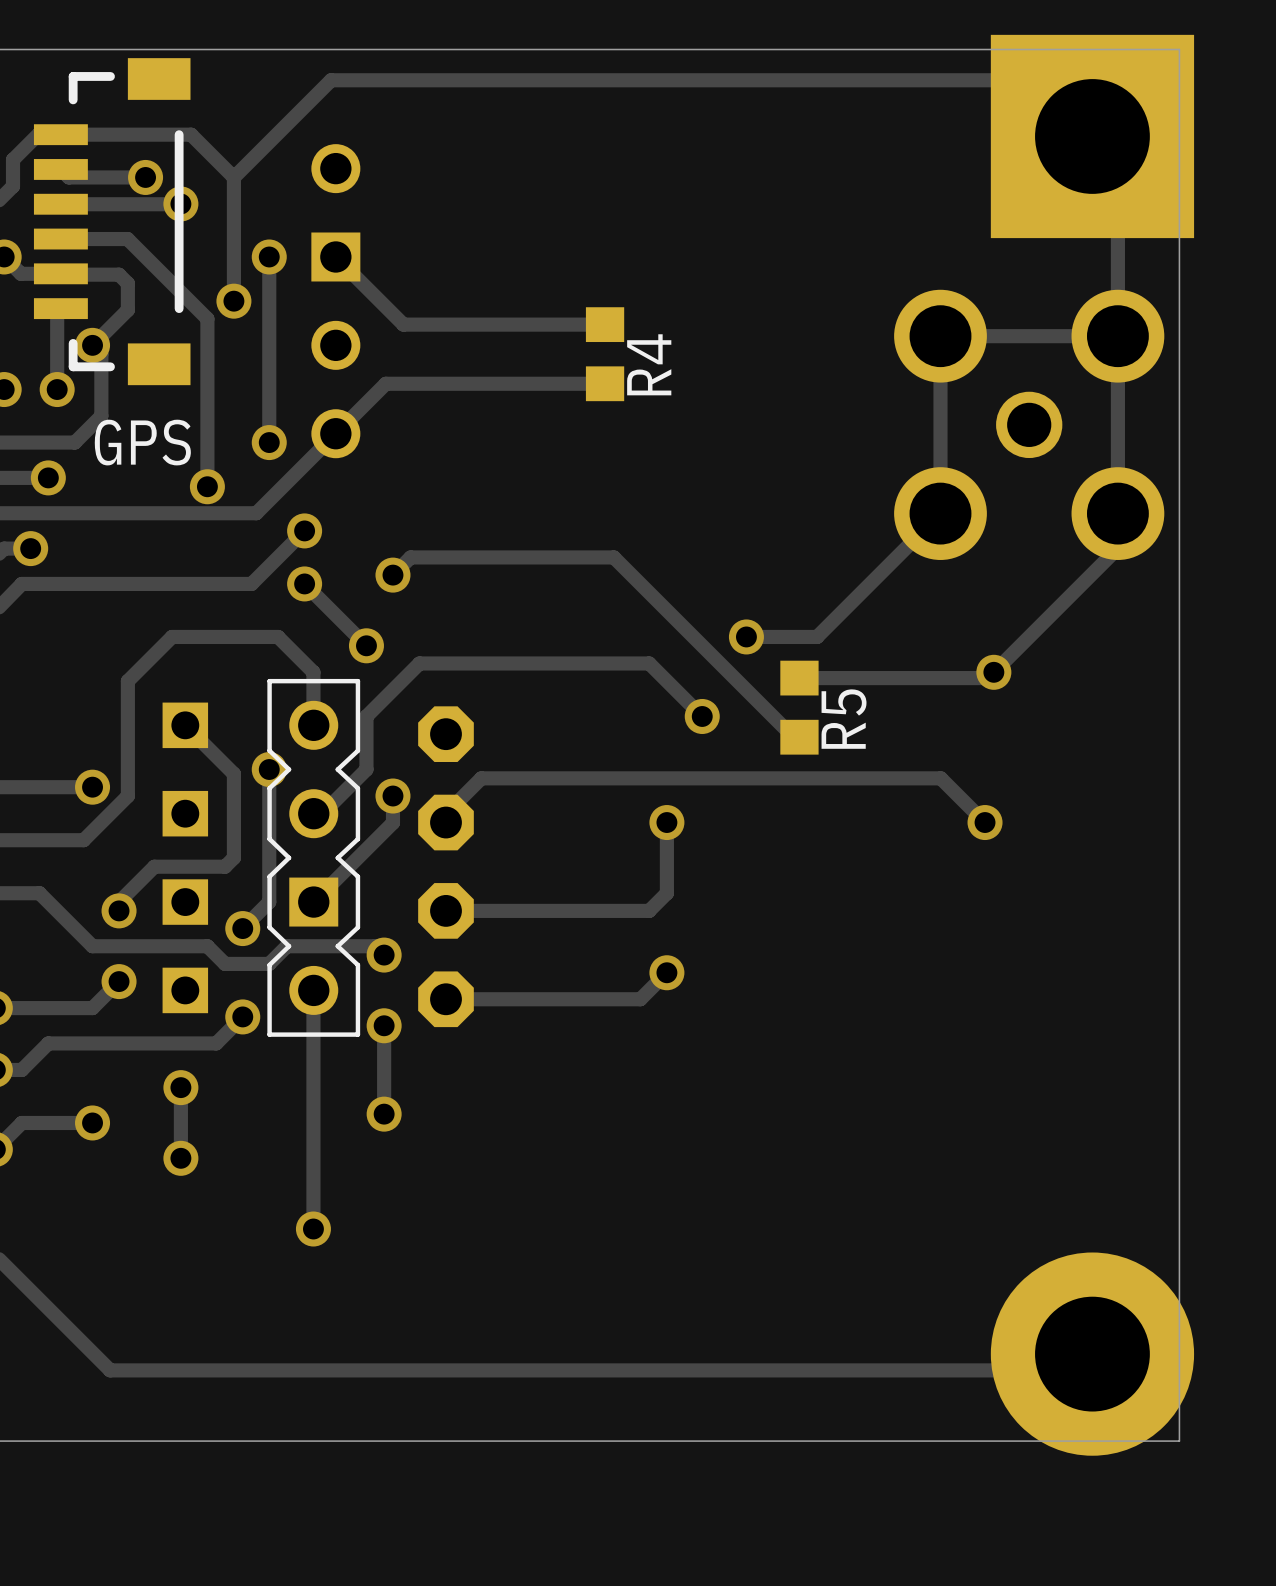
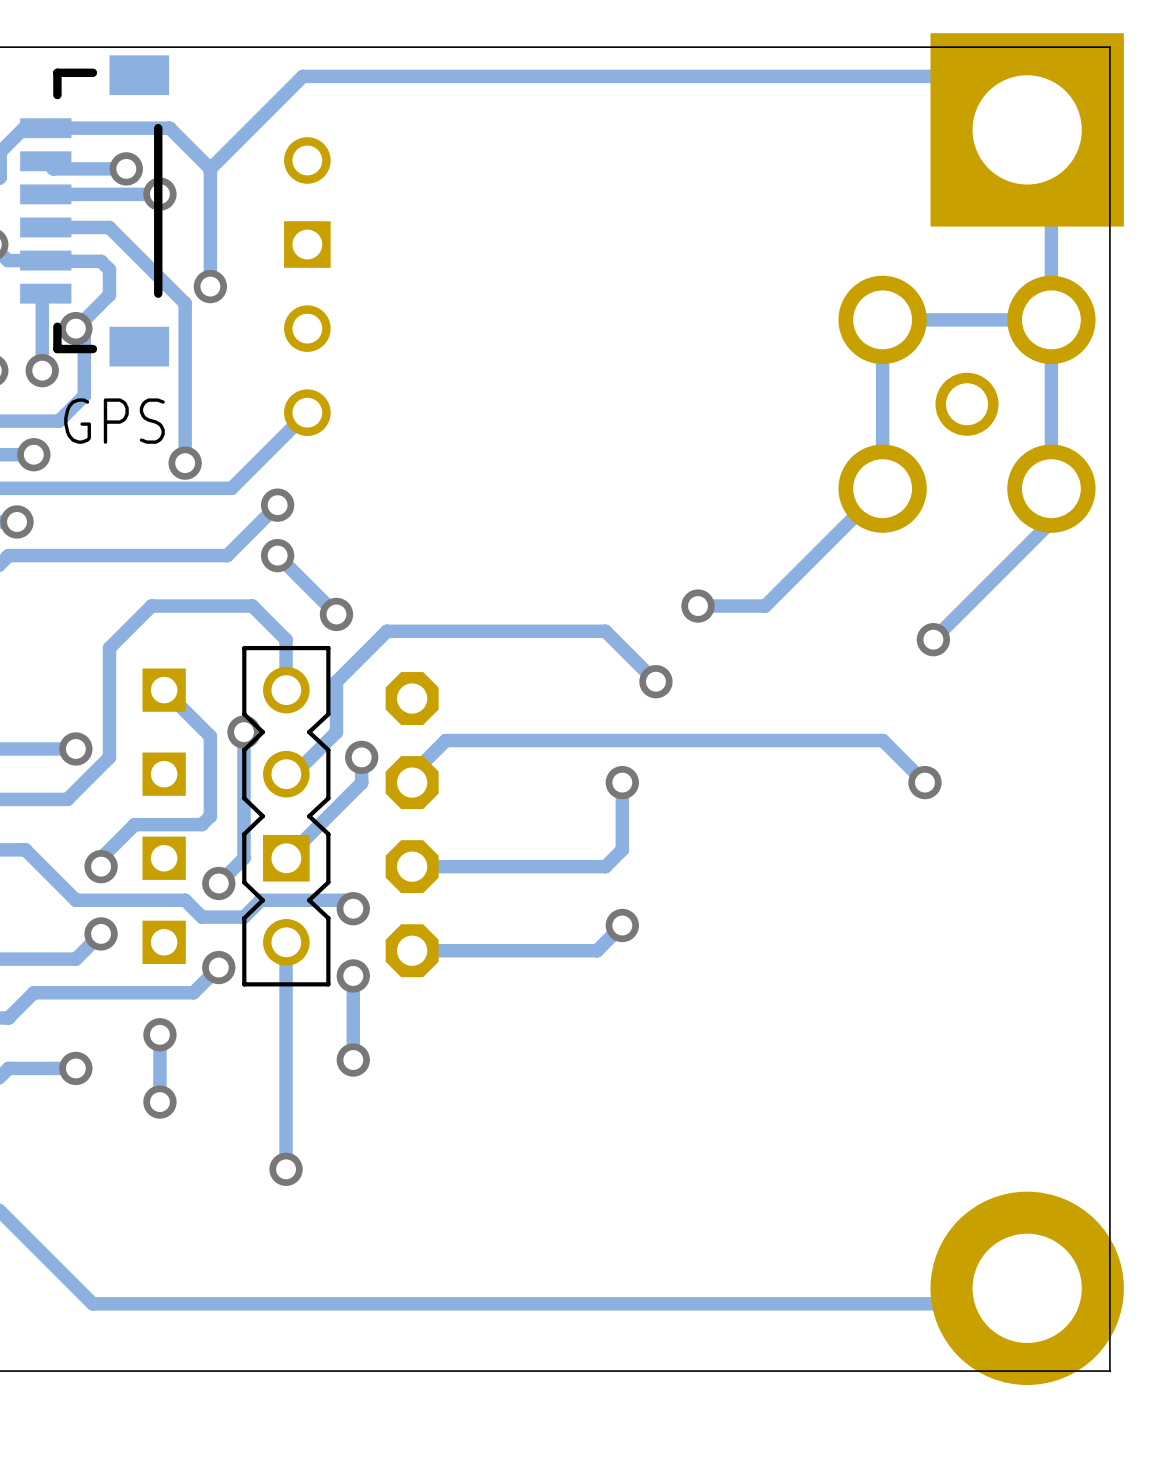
track: (269, 256) (269, 442) -> none
via: (269, 256) -> none
track: (335, 256) (403, 324) (605, 324) -> none
R4: (605, 354) -> none
track: (605, 383) (385, 383) (335, 433) -> none
via: (269, 442) -> none
track: (392, 575) (410, 557) (613, 557) (793, 737) (799, 737) -> none
via: (392, 575) -> none
track: (993, 672) (988, 678) (799, 678) -> none
R5: (799, 707) -> none

